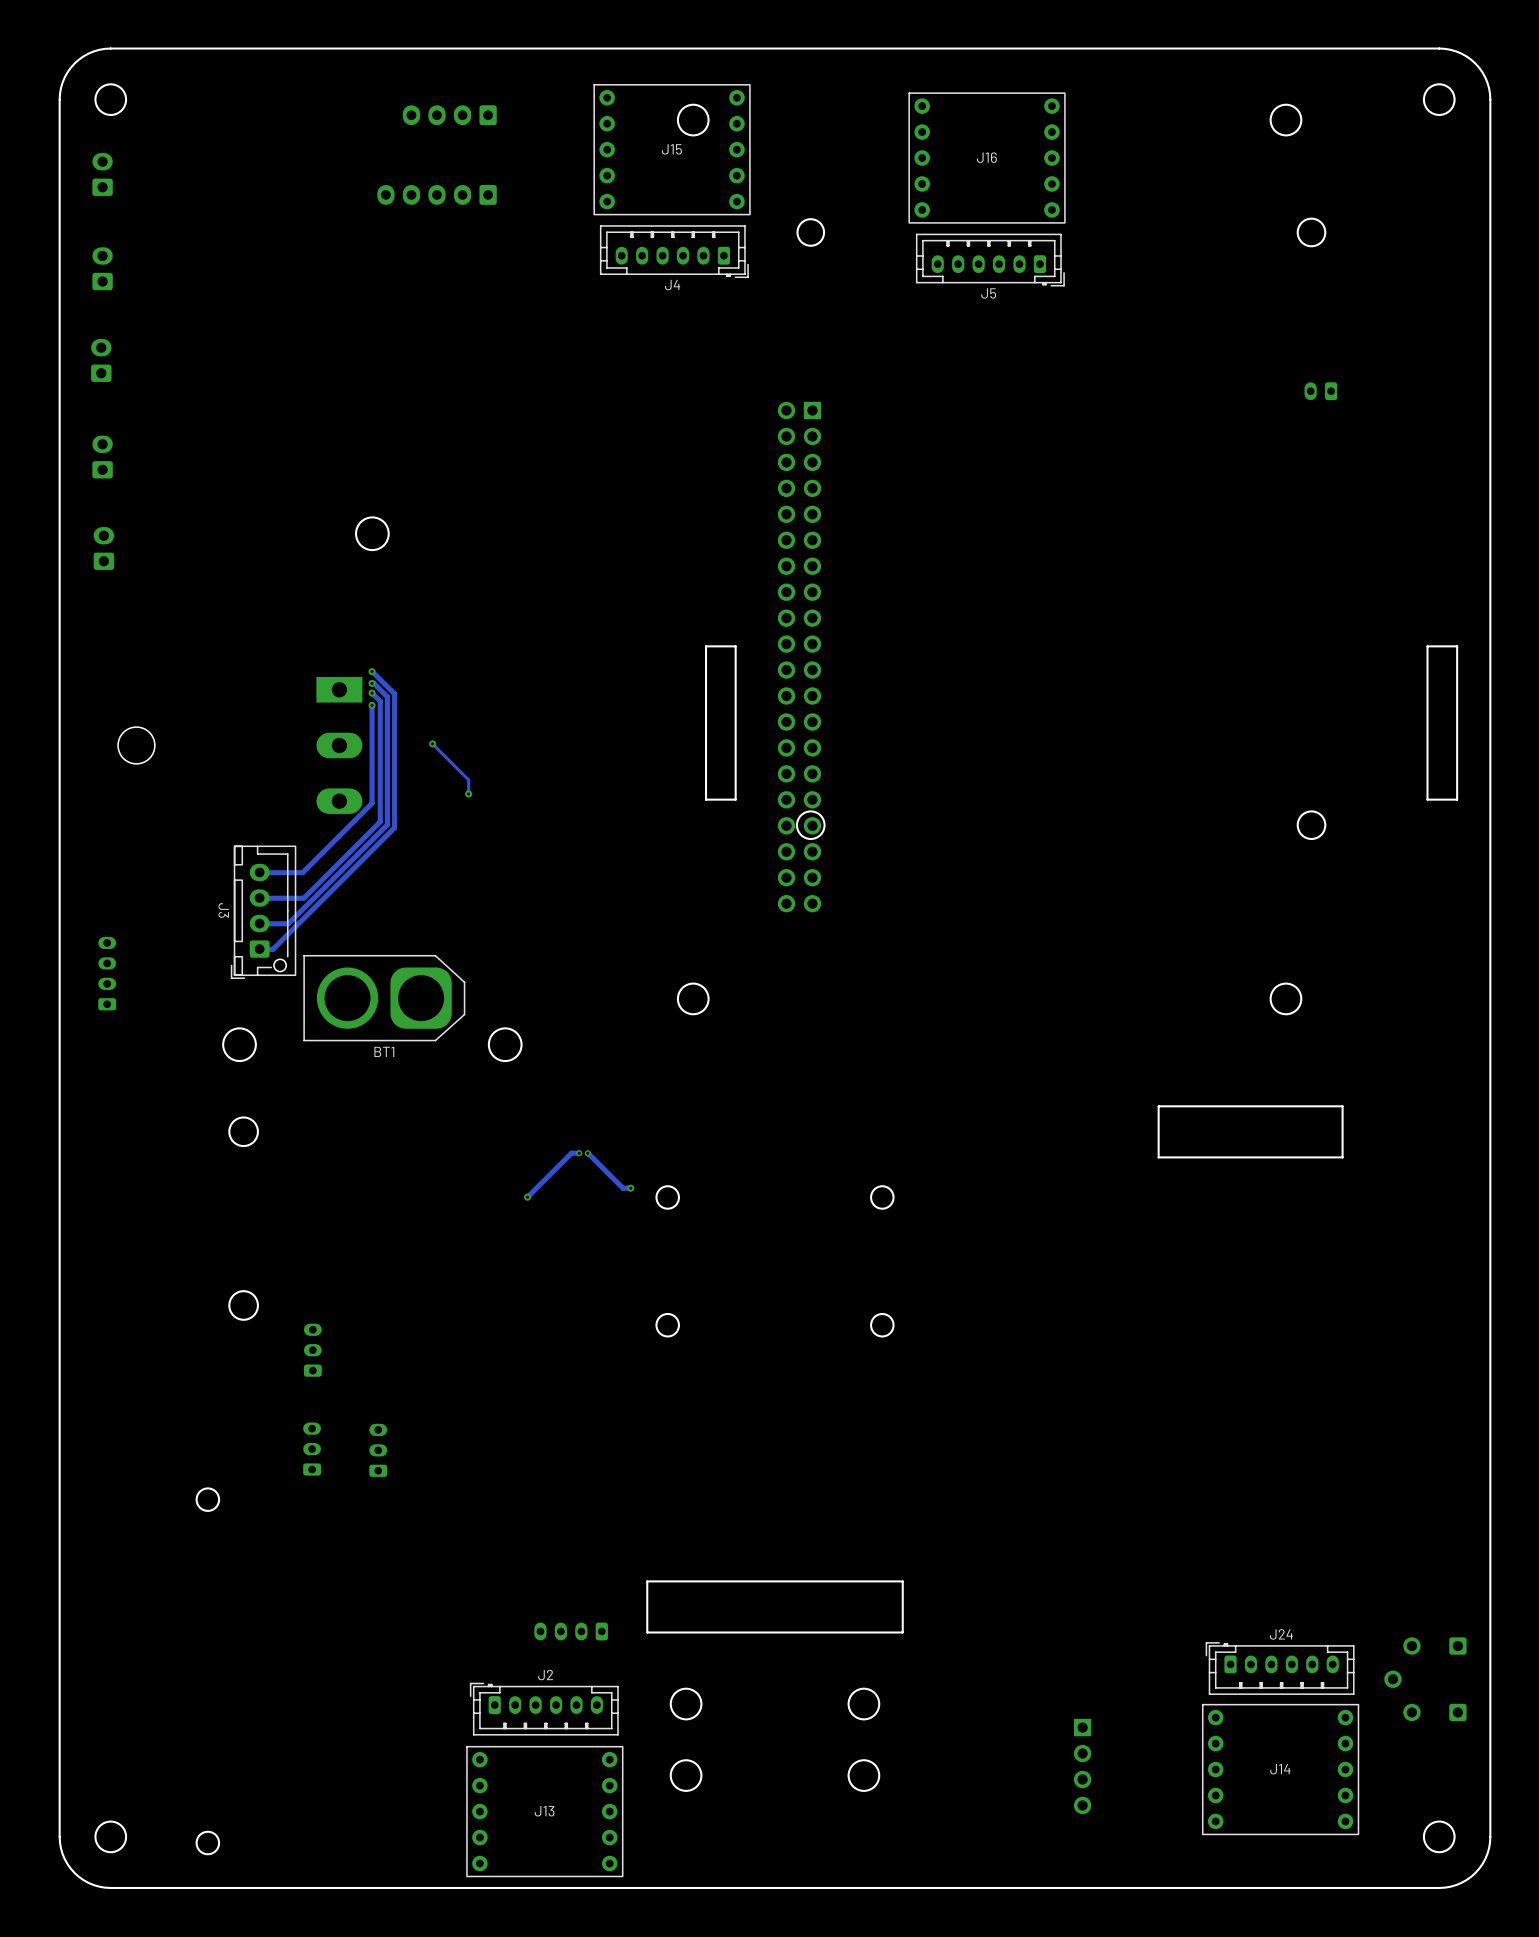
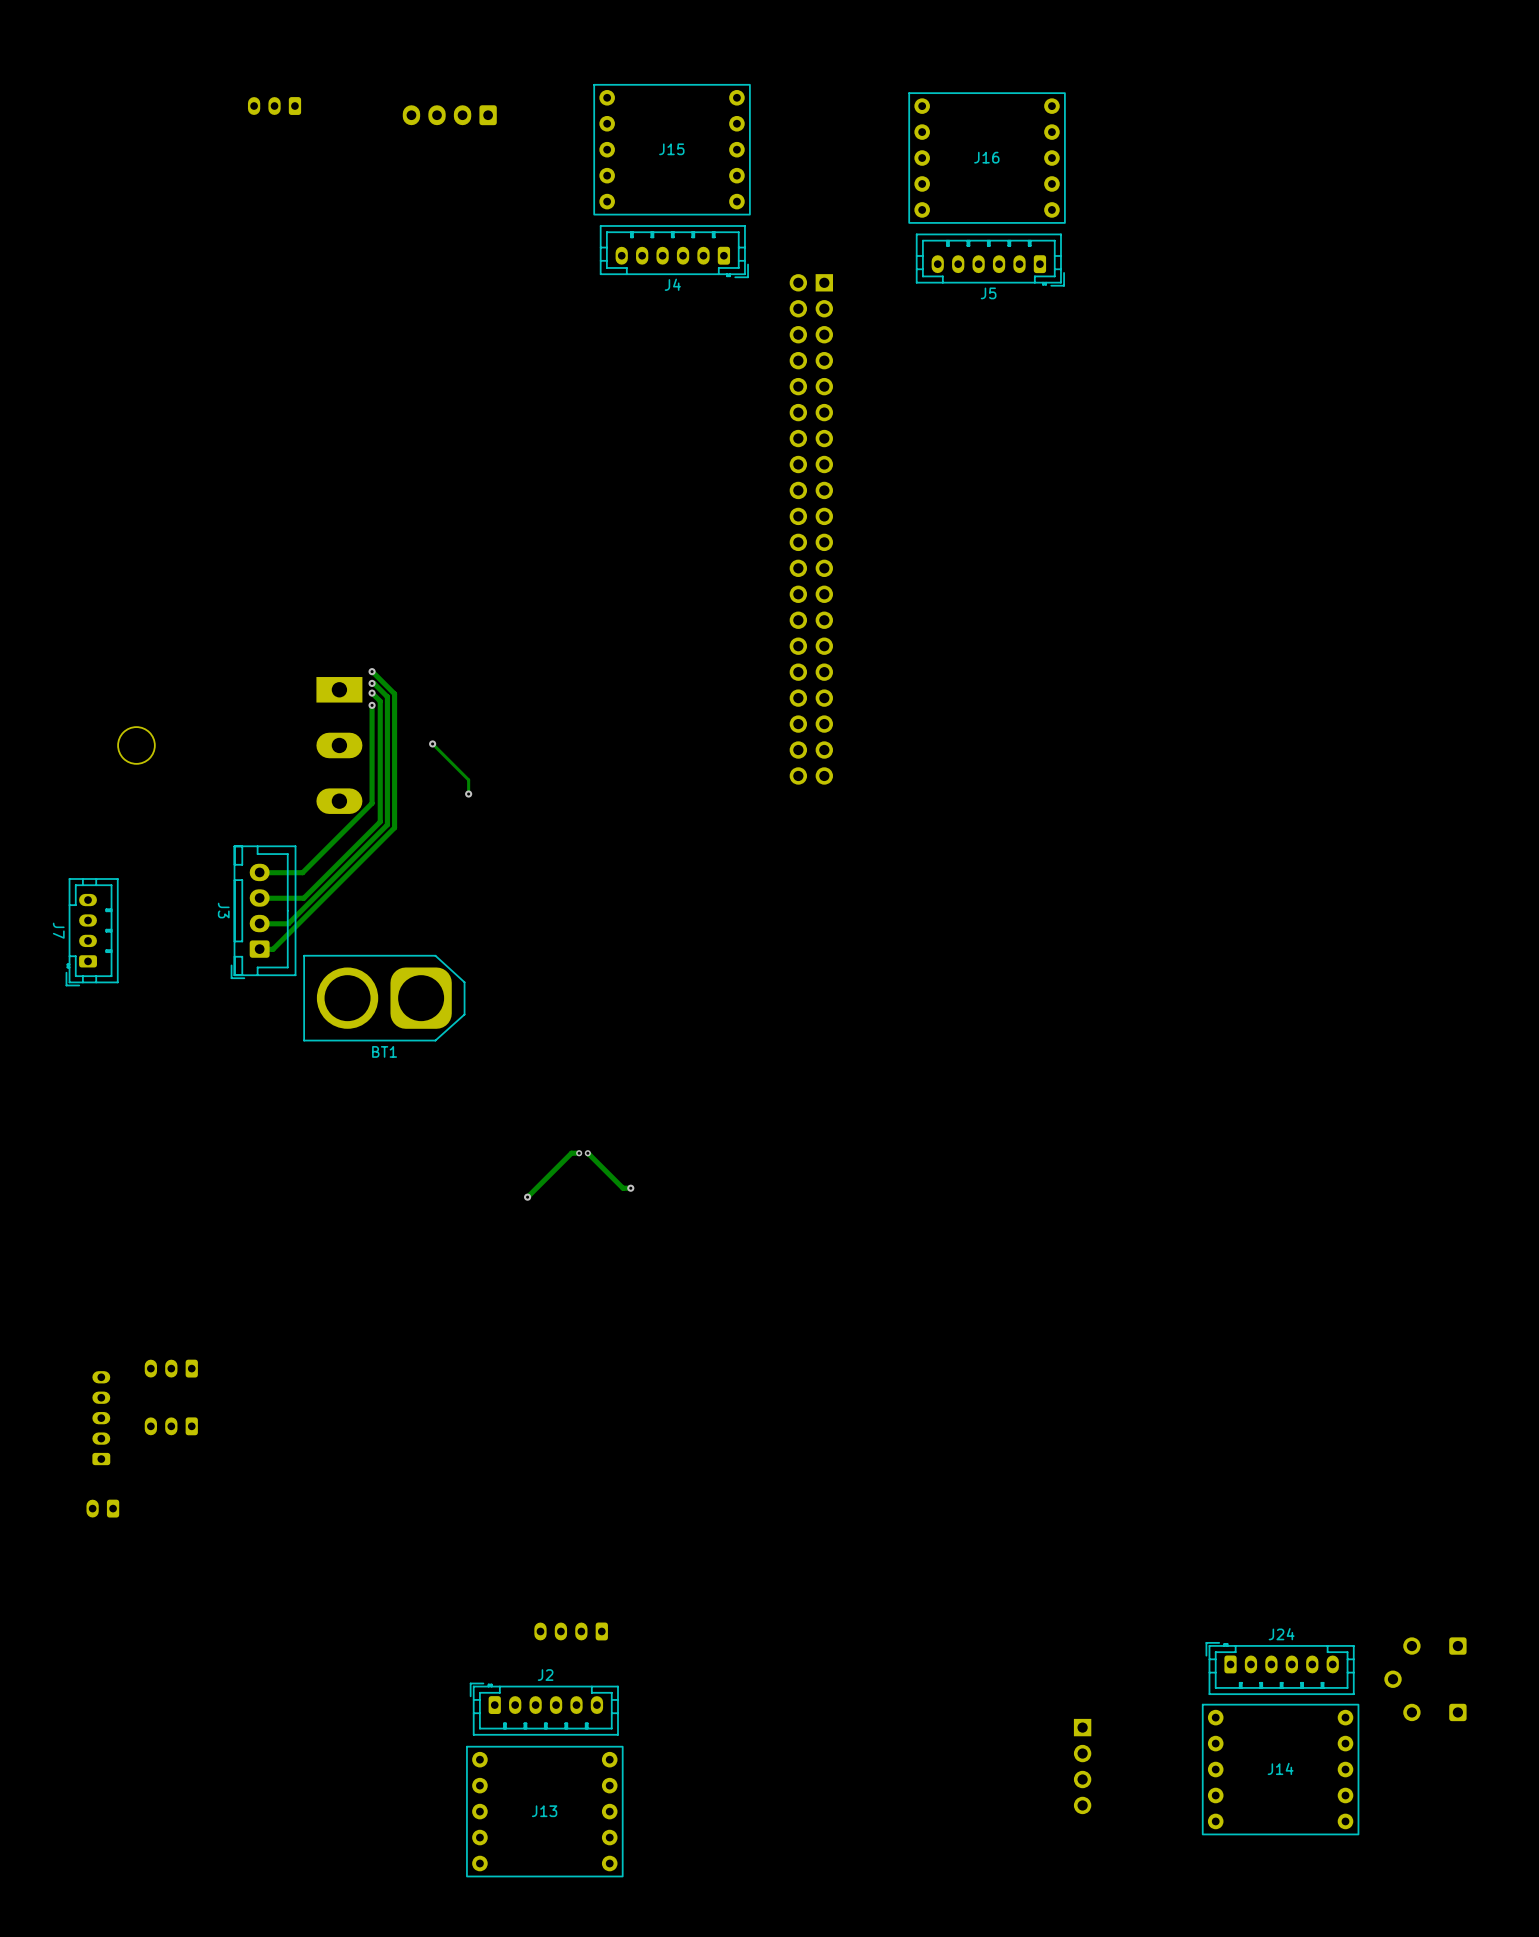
board edge: (1439, 48) (110, 48) (88, 53) (70, 67) (62, 82) (59, 99) (59, 1836) (64, 1859) (78, 1876) (93, 1885) (110, 1887) (1439, 1887) (1461, 1882) (1479, 1868) (1487, 1853) (1490, 1836) (1490, 99) (1485, 77) (1475, 63) (1461, 53) (1439, 48) -> none
round board edge: [94, 83, 128, 116] -> none
round board edge: [1422, 83, 1456, 116] -> none
round board edge: [676, 103, 710, 137] -> none
round board edge: [1269, 103, 1303, 137] -> none
part: none -> (274, 106)
part: (102, 174) -> none
part: (437, 194) -> none
round board edge: [1296, 217, 1327, 248] -> none
round board edge: [796, 218, 826, 247] -> none
part: (102, 268) -> none
part: (101, 360) -> none
part: (1320, 391) -> none
part: (102, 457) -> none
round board edge: [355, 516, 390, 552] -> none
part: (103, 548) -> none
board edge: (735, 646) (706, 646) (706, 799) (735, 799) (735, 646) -> none
board edge: (1457, 646) (1457, 799) (1427, 799) (1427, 646) (1457, 646) -> none
part position: (799, 657) -> (811, 529)
round board edge: [795, 810, 826, 841] -> none
round board edge: [1296, 810, 1327, 841] -> none
J3 footprint: [230, 845, 297, 979] -> [230, 845, 297, 979]
J7 side: top (107, 973) -> bottom (92, 932)
round board edge: [676, 982, 710, 1016] -> none
round board edge: [1269, 982, 1303, 1016] -> none
round board edge: [222, 1027, 257, 1063] -> none
round board edge: [487, 1027, 523, 1063] -> none
board edge: (1342, 1106) (1342, 1157) (1158, 1157) (1158, 1106) (1342, 1106) -> none
round board edge: [228, 1116, 259, 1148] -> none
round board edge: [655, 1185, 680, 1210] -> none
round board edge: [870, 1185, 895, 1210] -> none
round board edge: [228, 1290, 259, 1321] -> none
round board edge: [655, 1312, 680, 1338] -> none
round board edge: [870, 1312, 895, 1338] -> none
part: (312, 1350) -> none
part: none -> (171, 1368)
part: none -> (101, 1418)
part: none -> (171, 1426)
part: (312, 1449) -> none
part: (378, 1450) -> none
round board edge: [195, 1487, 221, 1512] -> none
part: none -> (102, 1508)
board edge: (902, 1581) (647, 1581) (647, 1632) (902, 1632) (902, 1581) -> none
round board edge: [669, 1687, 703, 1721] -> none
round board edge: [847, 1687, 881, 1721] -> none
round board edge: [669, 1759, 703, 1792] -> none
round board edge: [847, 1759, 881, 1792] -> none
round board edge: [94, 1820, 128, 1854] -> none
round board edge: [1422, 1820, 1456, 1854] -> none
round board edge: [195, 1830, 221, 1856] -> none

